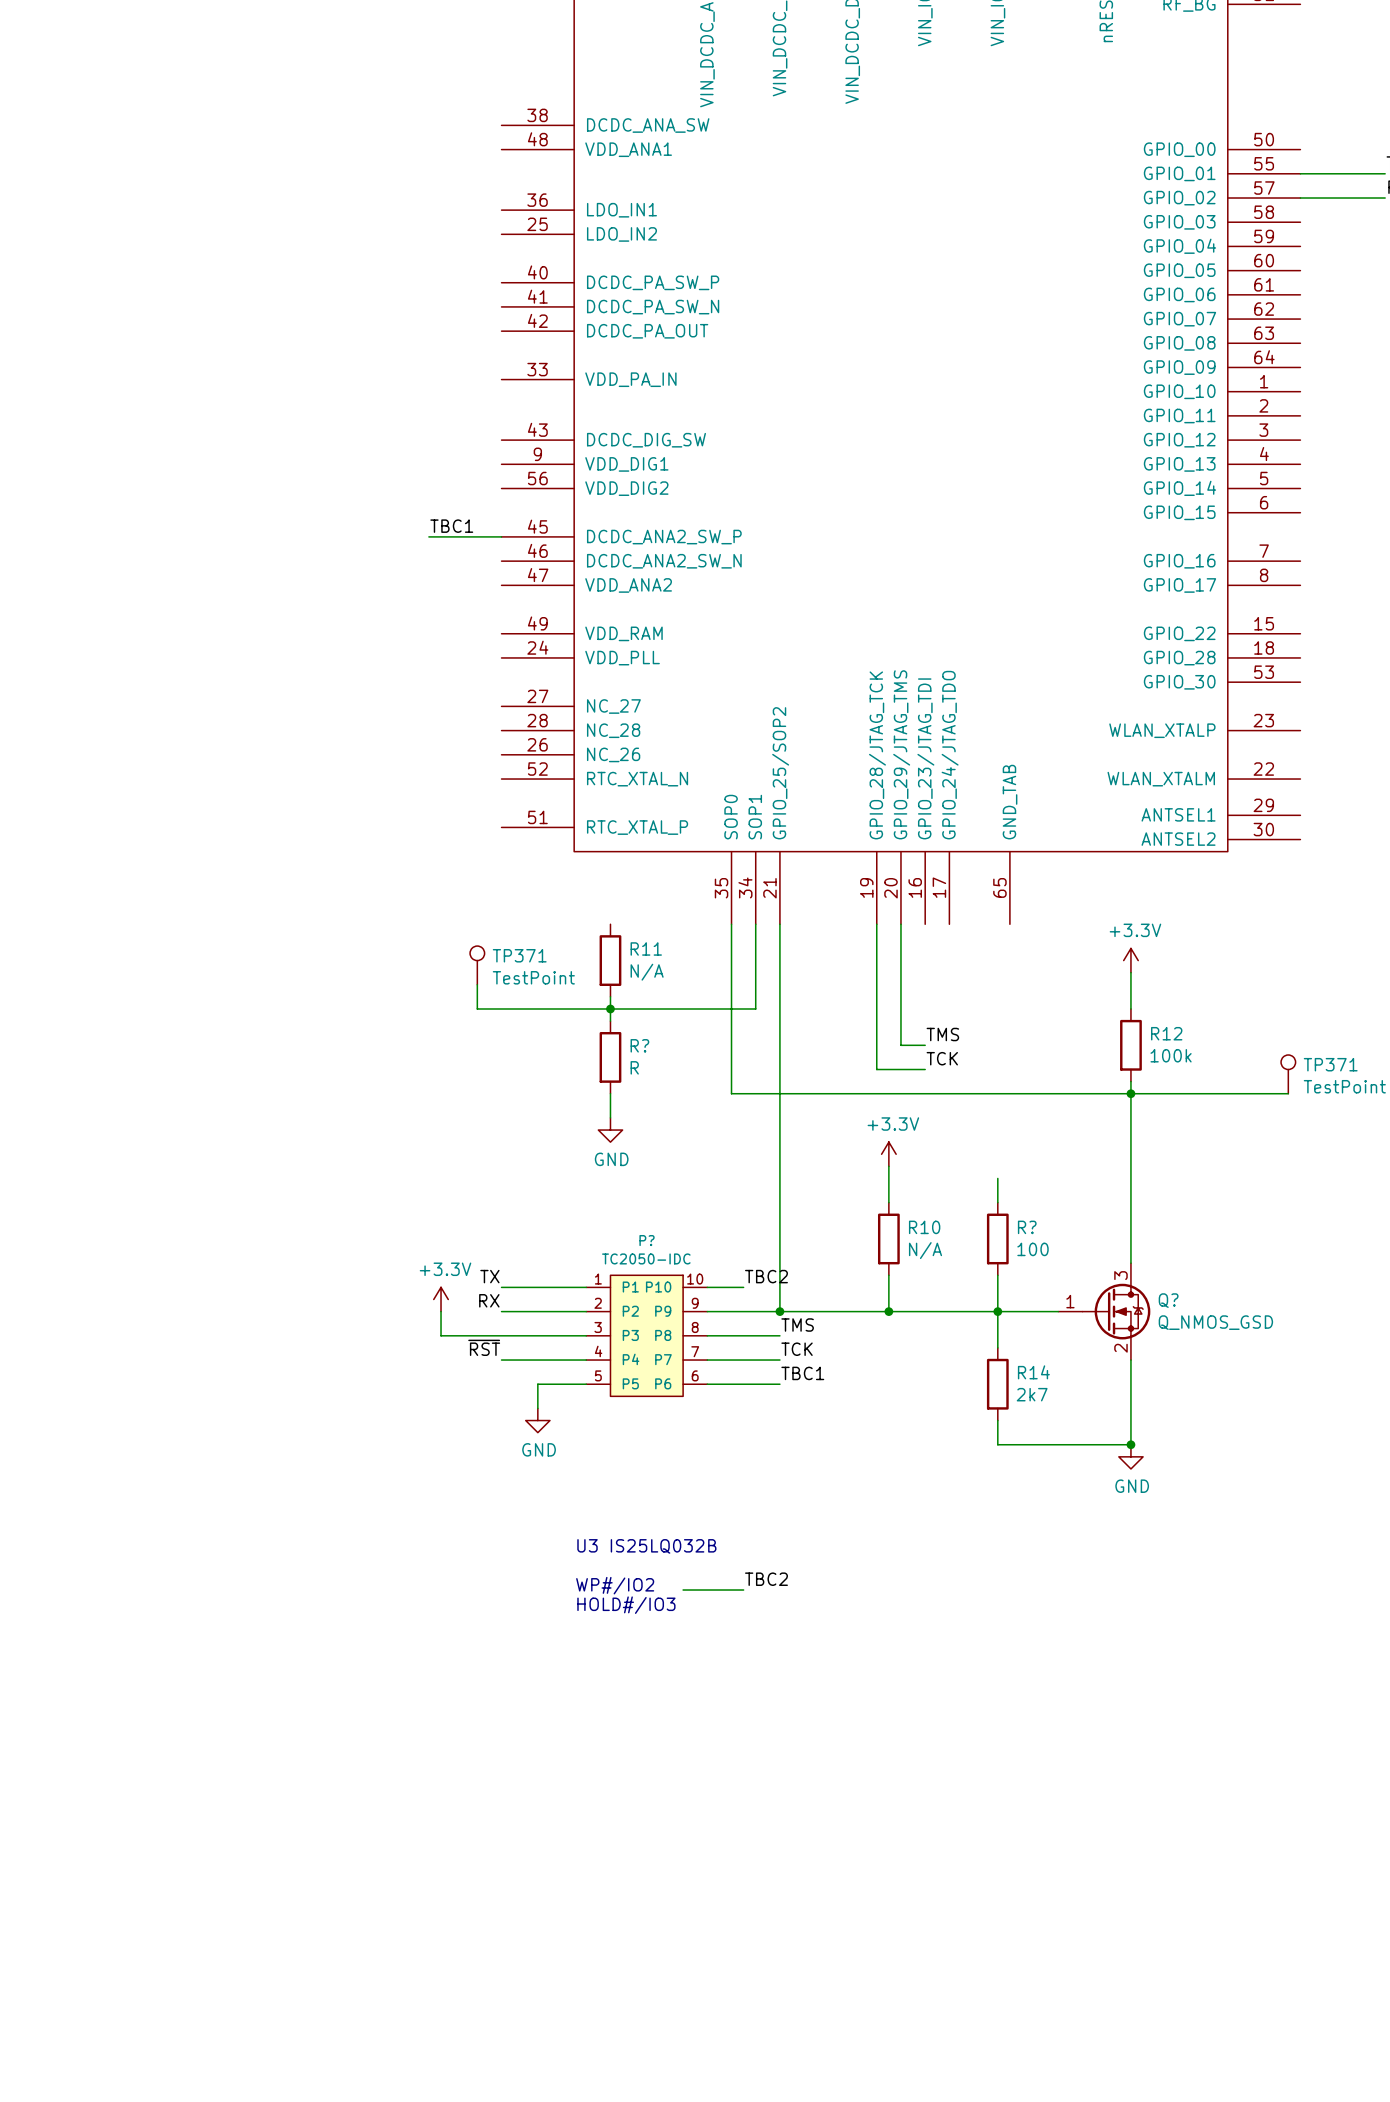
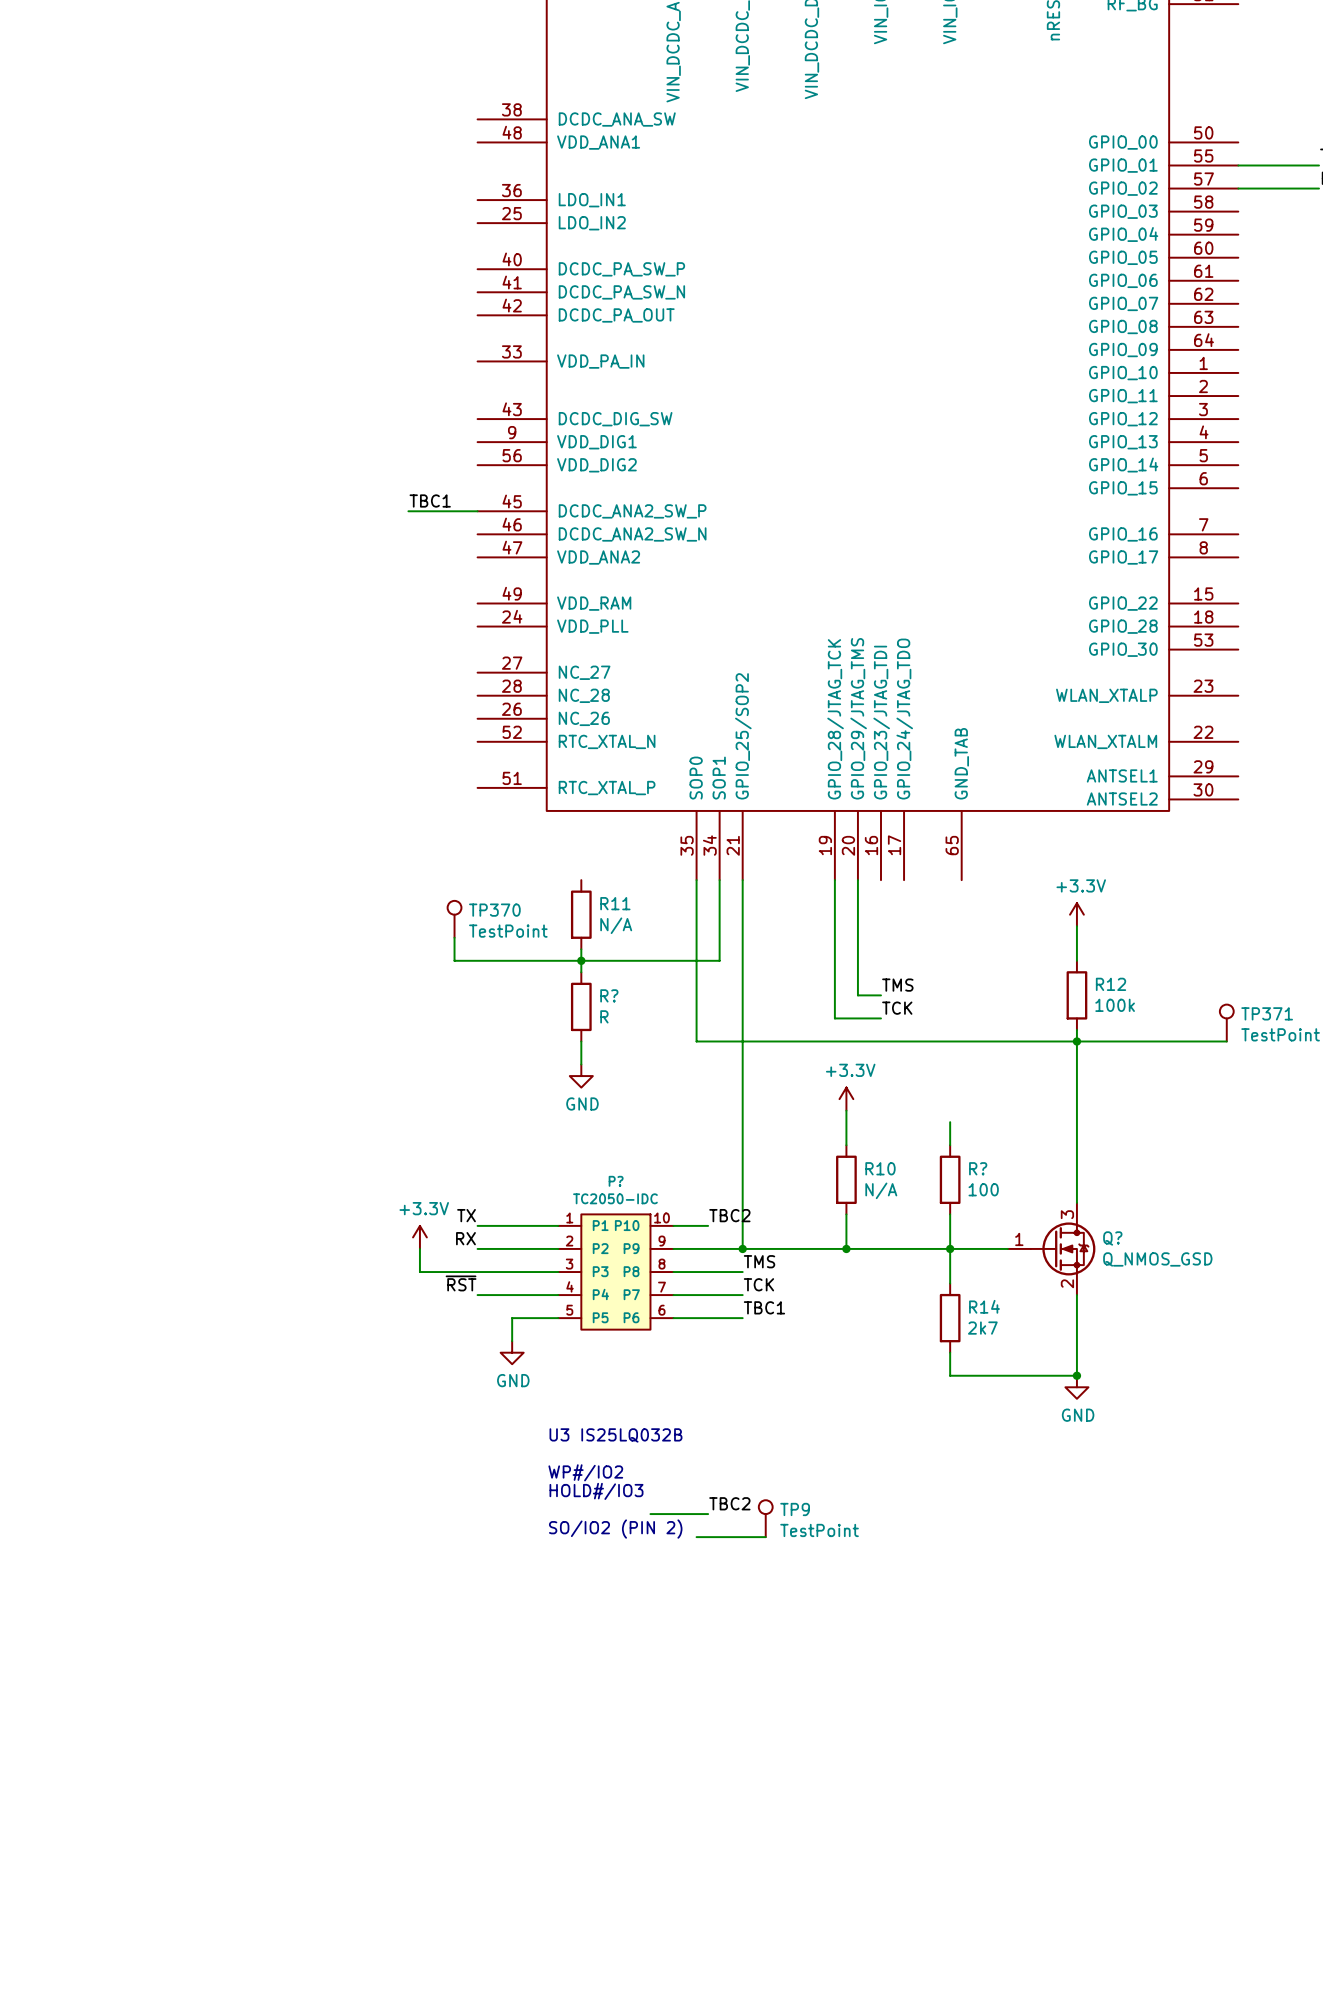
TP371 name: TP371 (519, 955) -> TP370 (494, 910)
text: none -> U3 IS25LQ032B (615, 1435)
text: U3 IS25LQ032B (646, 1546) -> WP#/IO2 (585, 1472)
text: none -> HOLD#/IO3 (596, 1491)
text: WP#/IO2 (615, 1585) -> none
TP9: none -> TestPoint (765, 1518)
text: HOLD#/IO3 (626, 1605) -> SO/IO2 (PIN 2) (615, 1529)
wire: none -> (696, 1537) (765, 1537)

